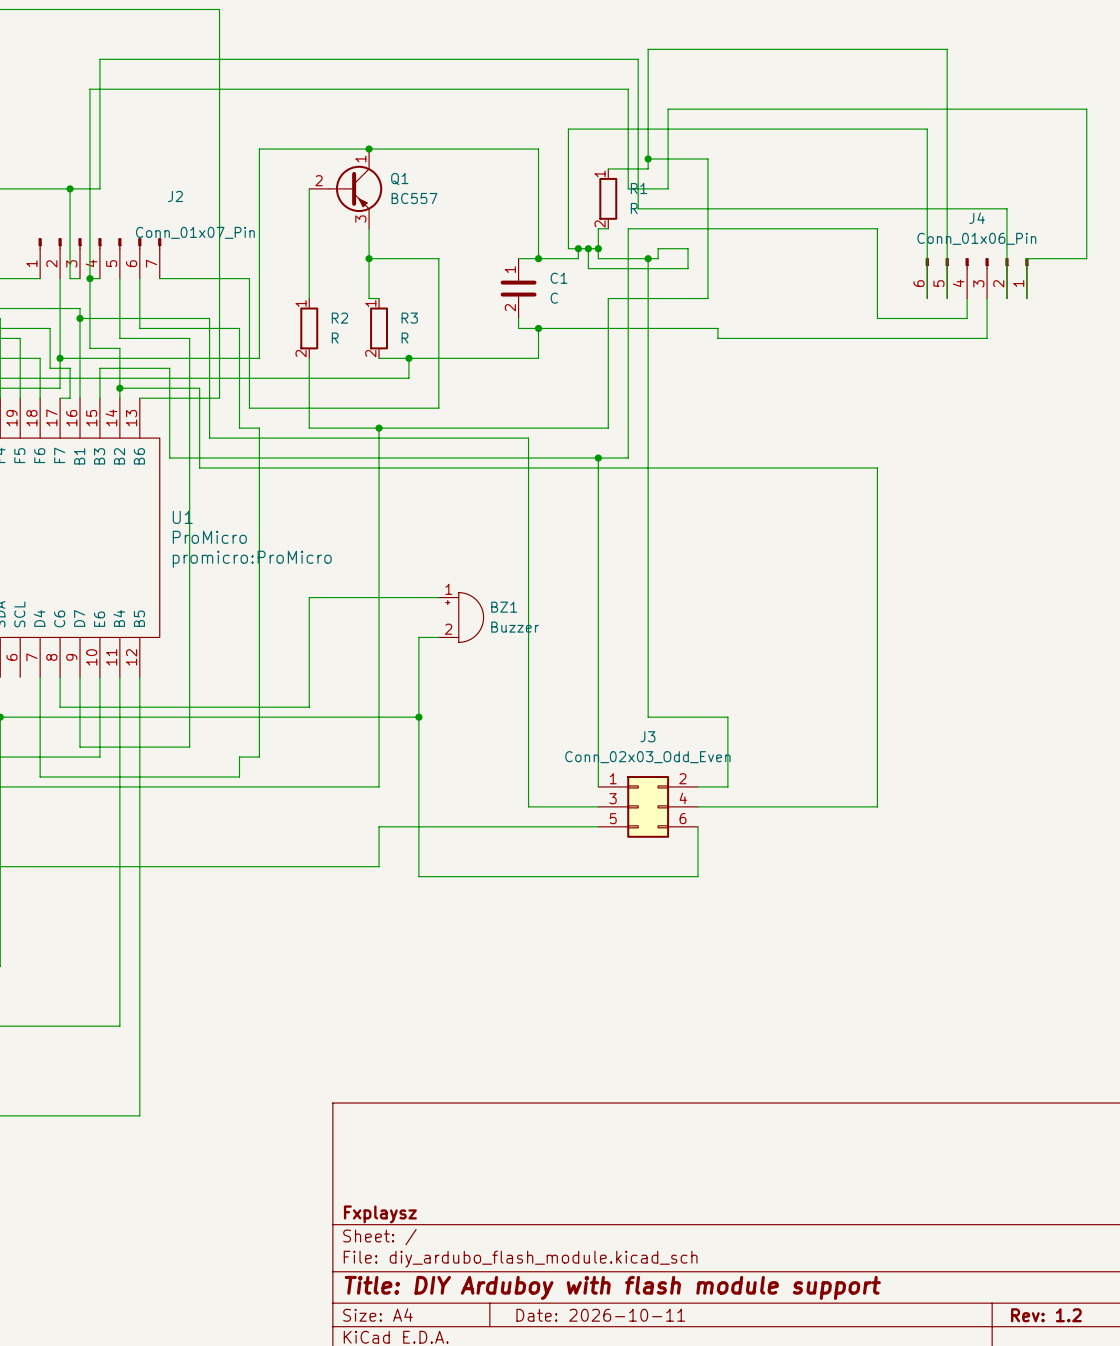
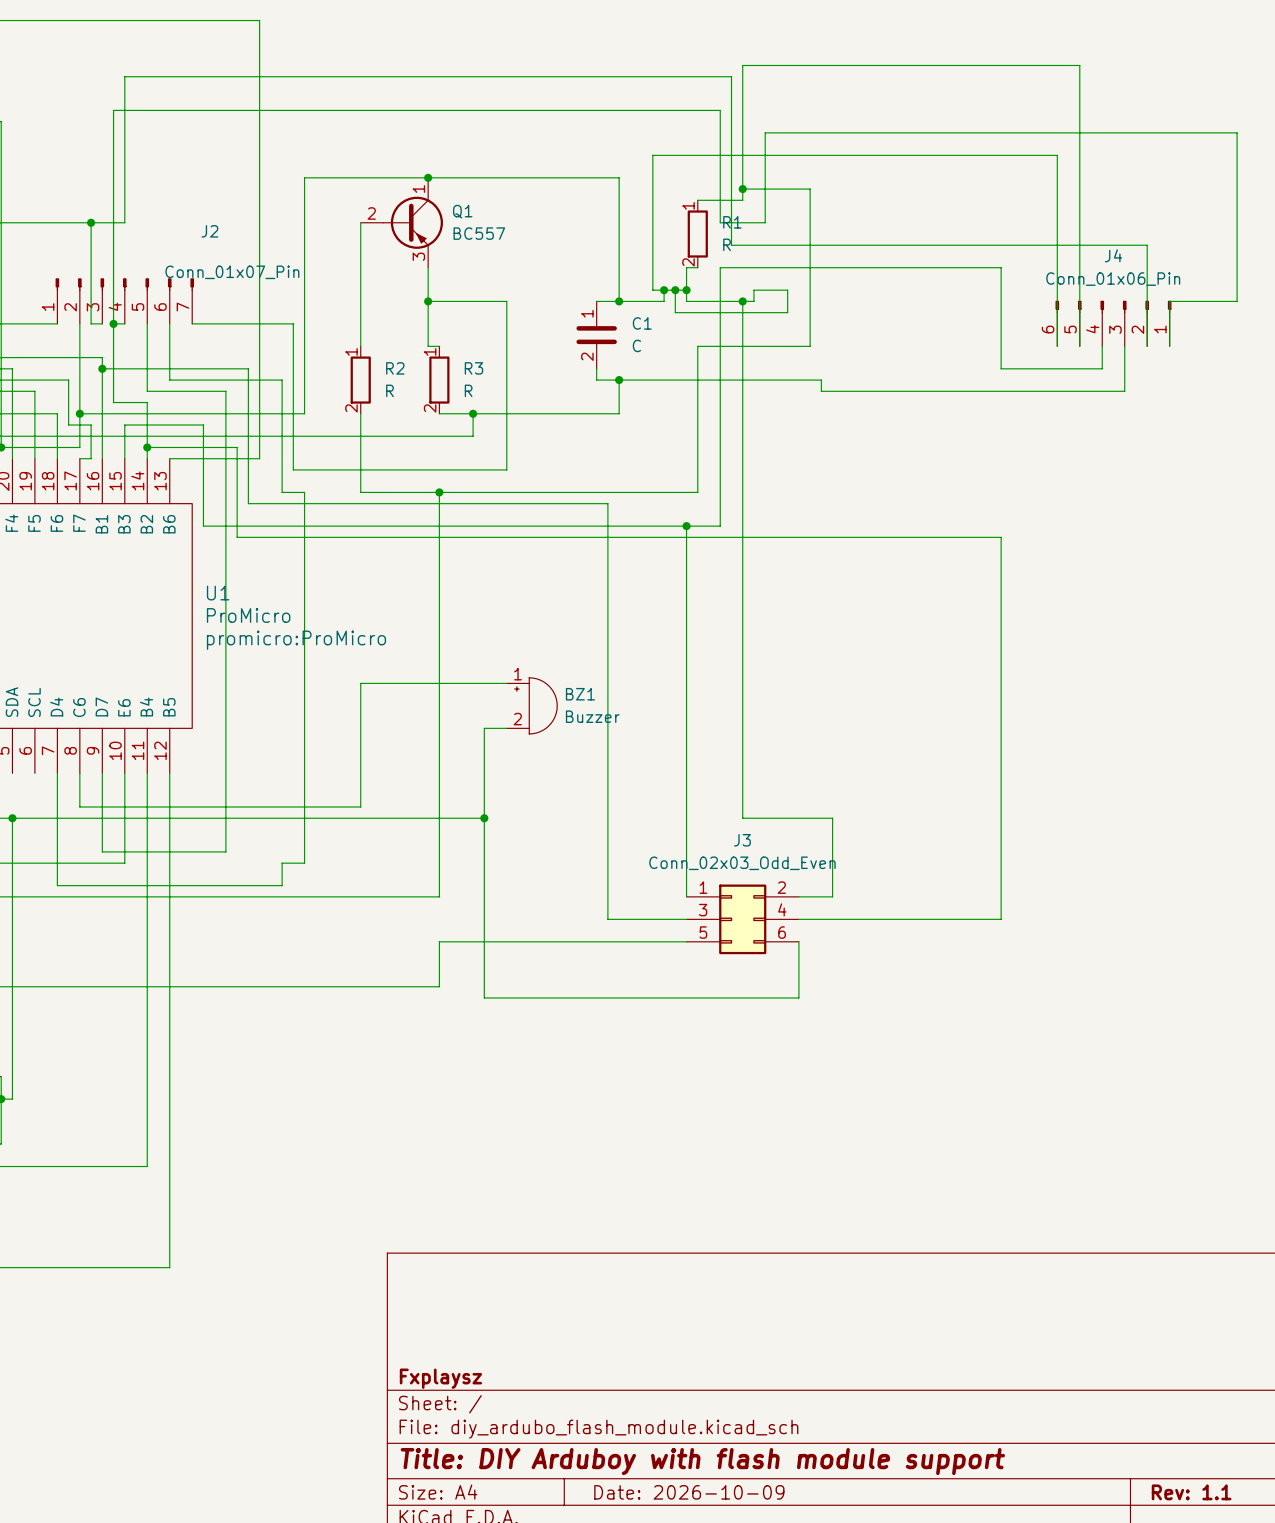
title block: Date: 2026-10-11 (600, 1315) -> Date: 2026-10-09 (689, 1492)
title block: Rev: 1.2 (1046, 1315) -> Rev: 1.1 (1191, 1492)

